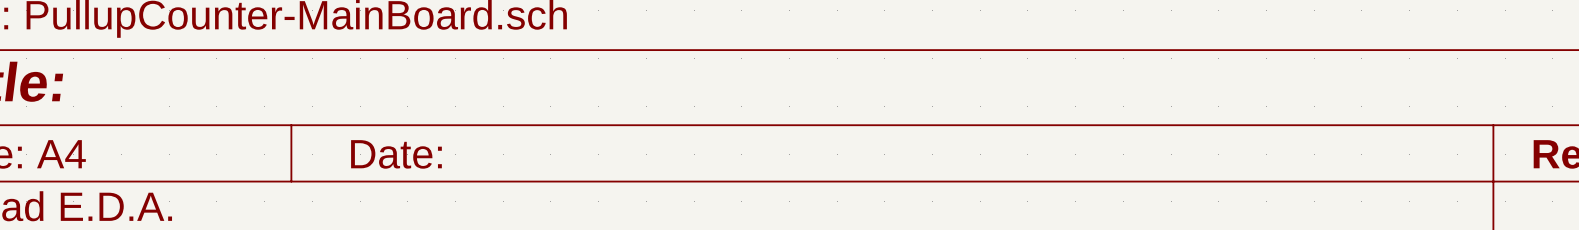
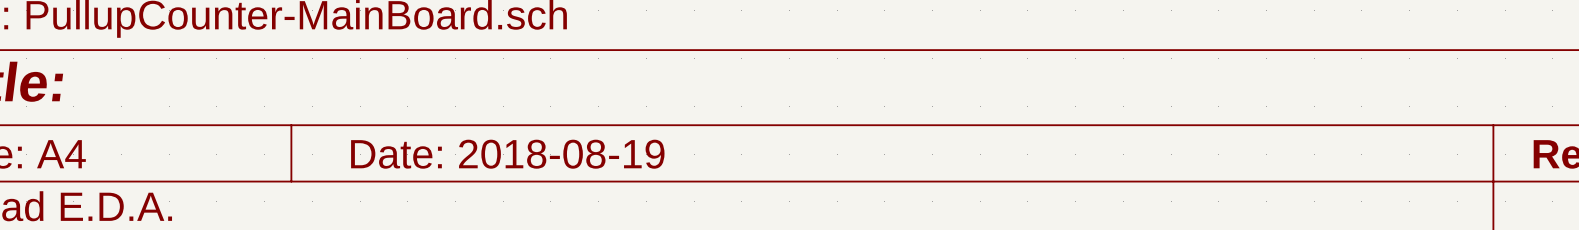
title block: Date: (396, 154) -> Date: 2018-08-19 (507, 154)

